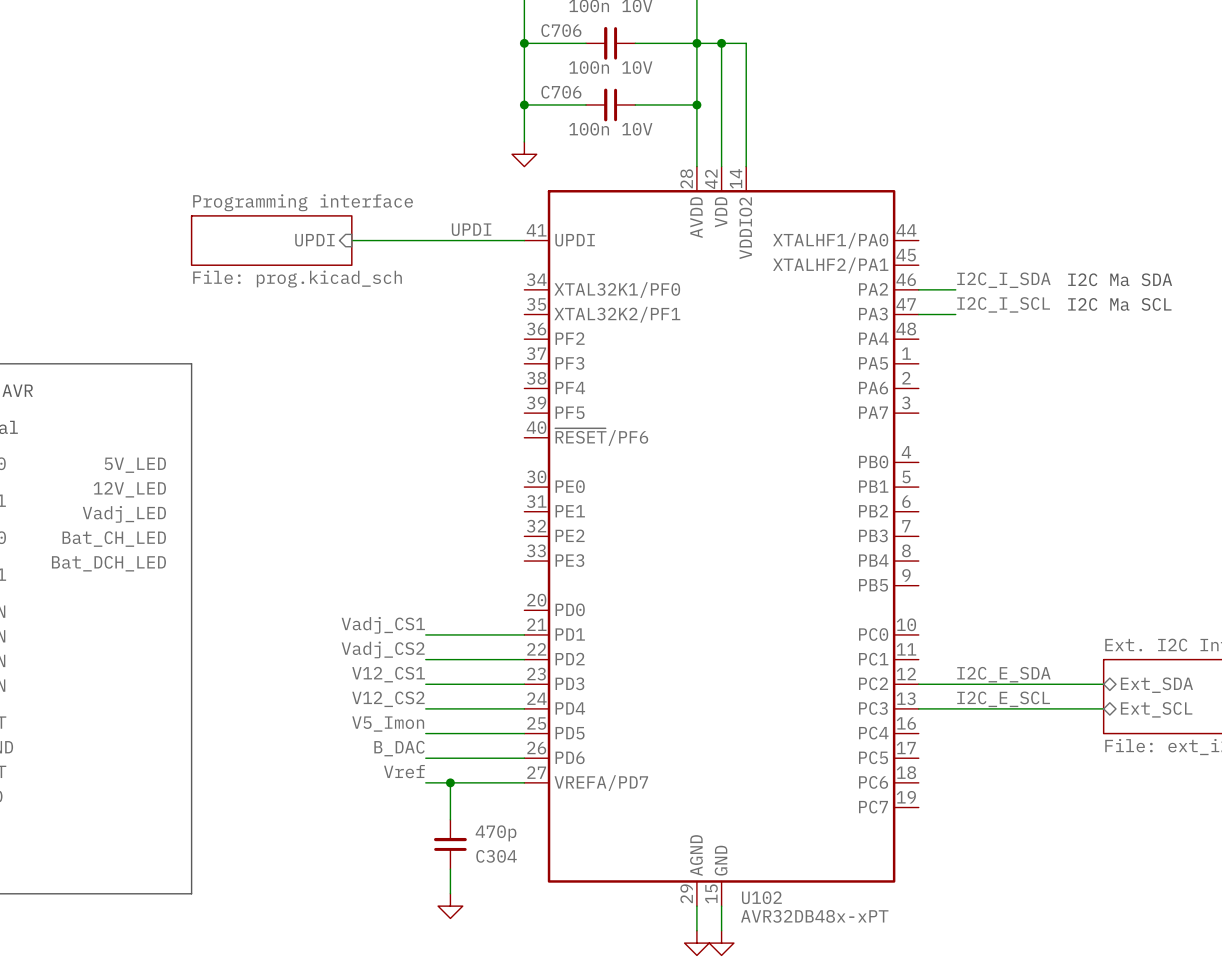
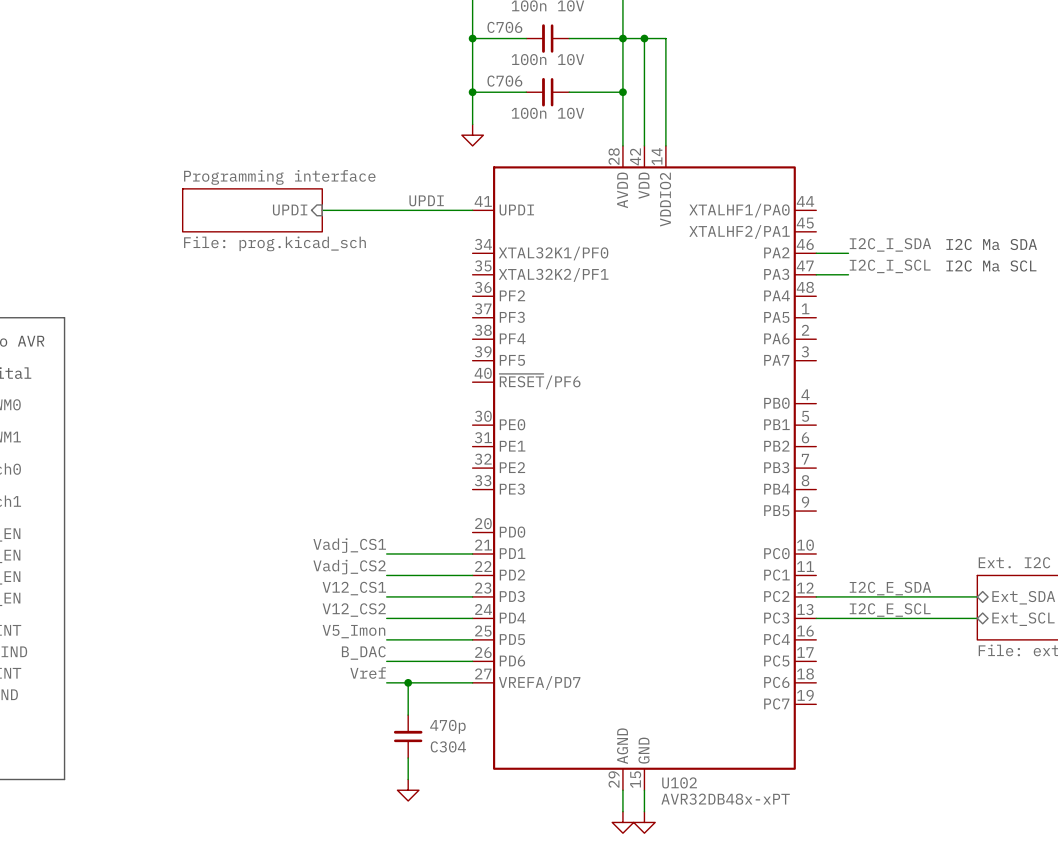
line: (56, 363) (191, 363) (191, 893) (56, 893) -> (64, 317) (64, 779)
label: 5V_LED (135, 465) -> none
label: 12V_LED (129, 489) -> none
label: Vadj_LED (124, 514) -> none
label: Bat_CH_LED (114, 539) -> none
label: Bat_DCH_LED (108, 563) -> none

